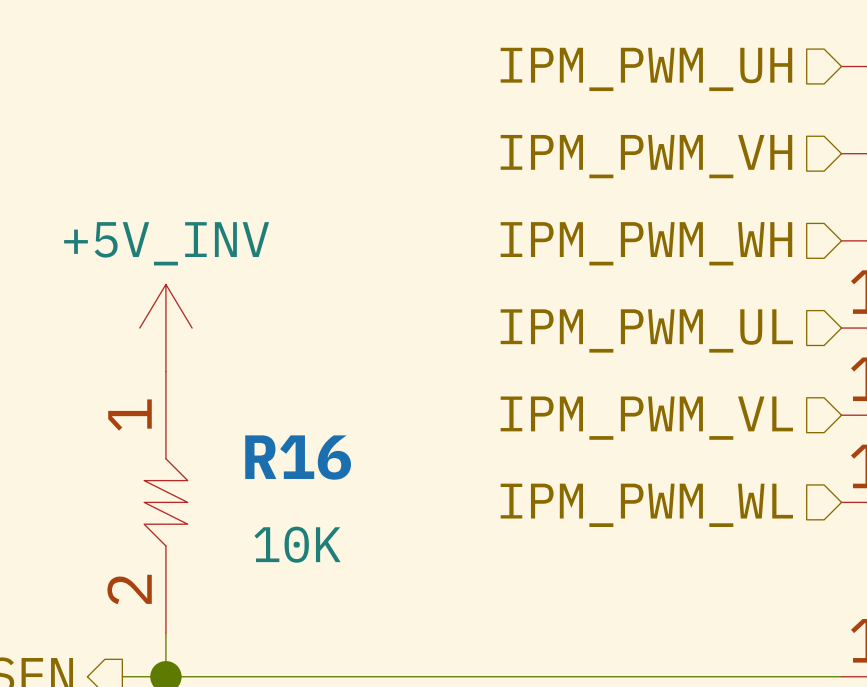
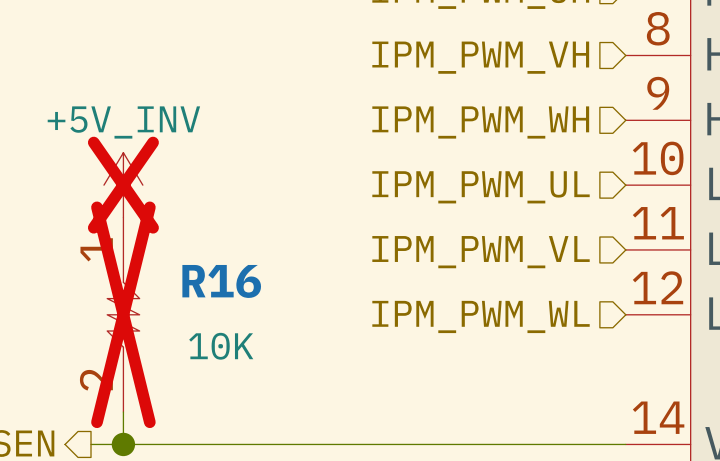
power symbol do-not-place cross: none -> (123, 185)
R16 do-not-place cross: none -> (123, 314)

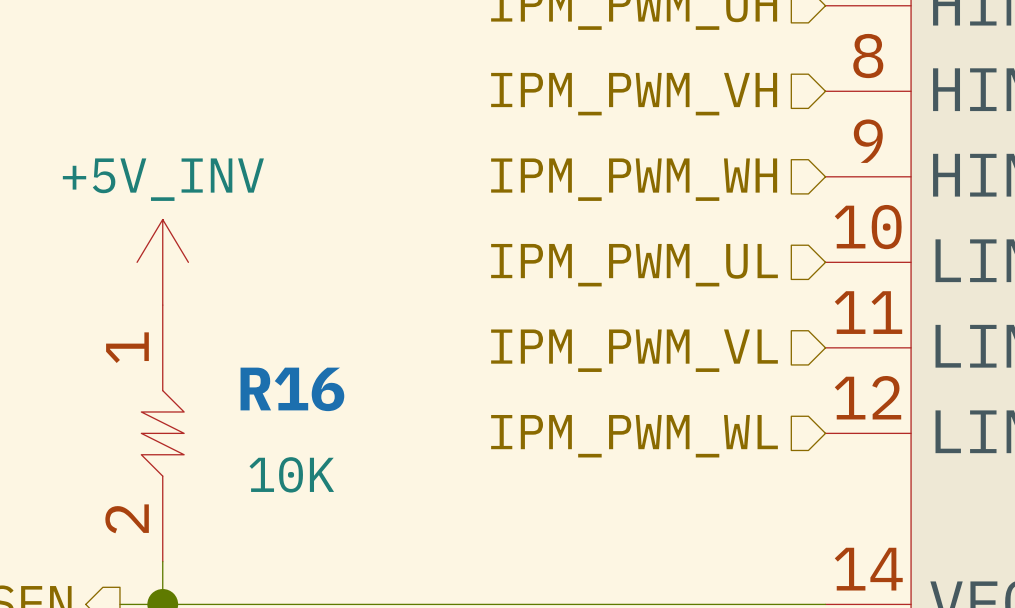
power symbol do-not-place cross: (123, 185) -> none
R16 do-not-place cross: (123, 314) -> none

